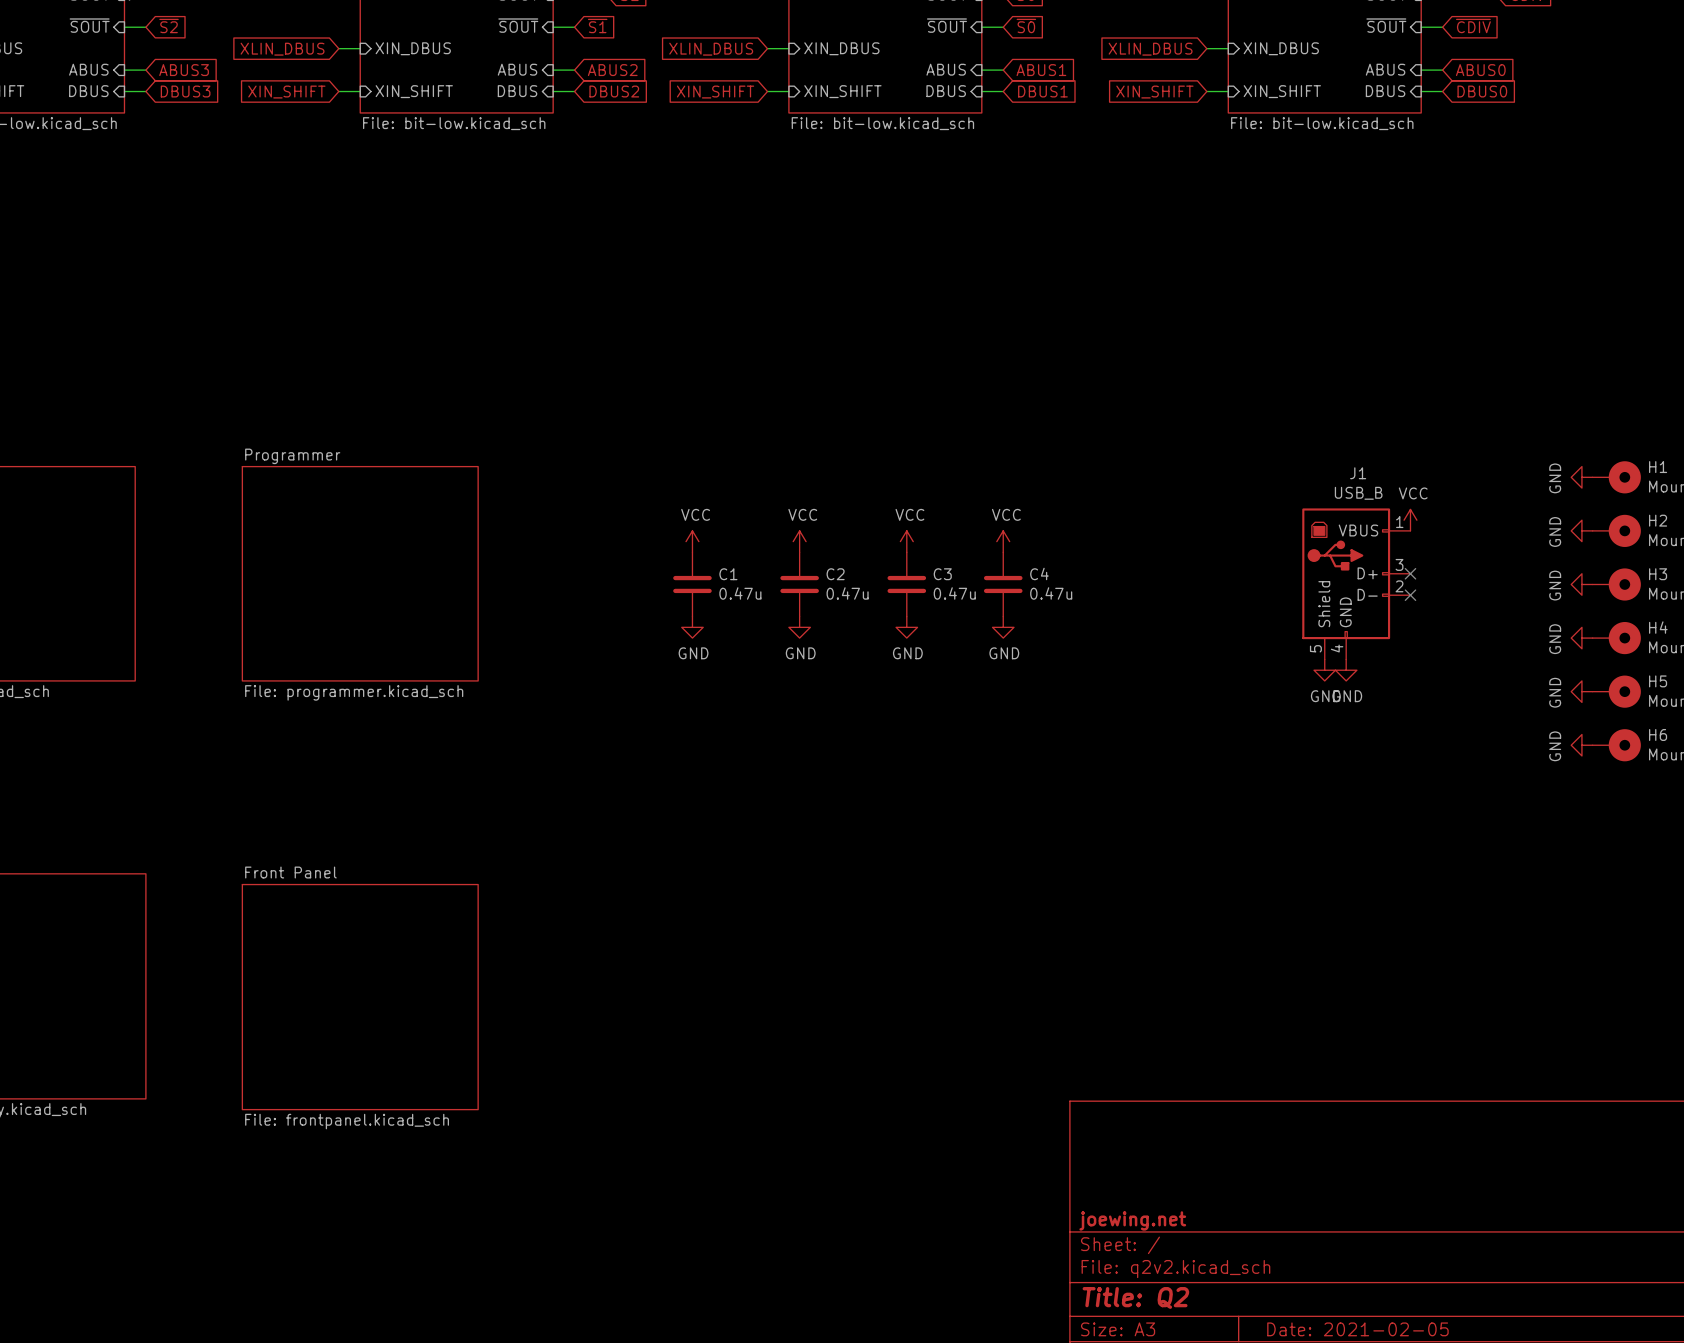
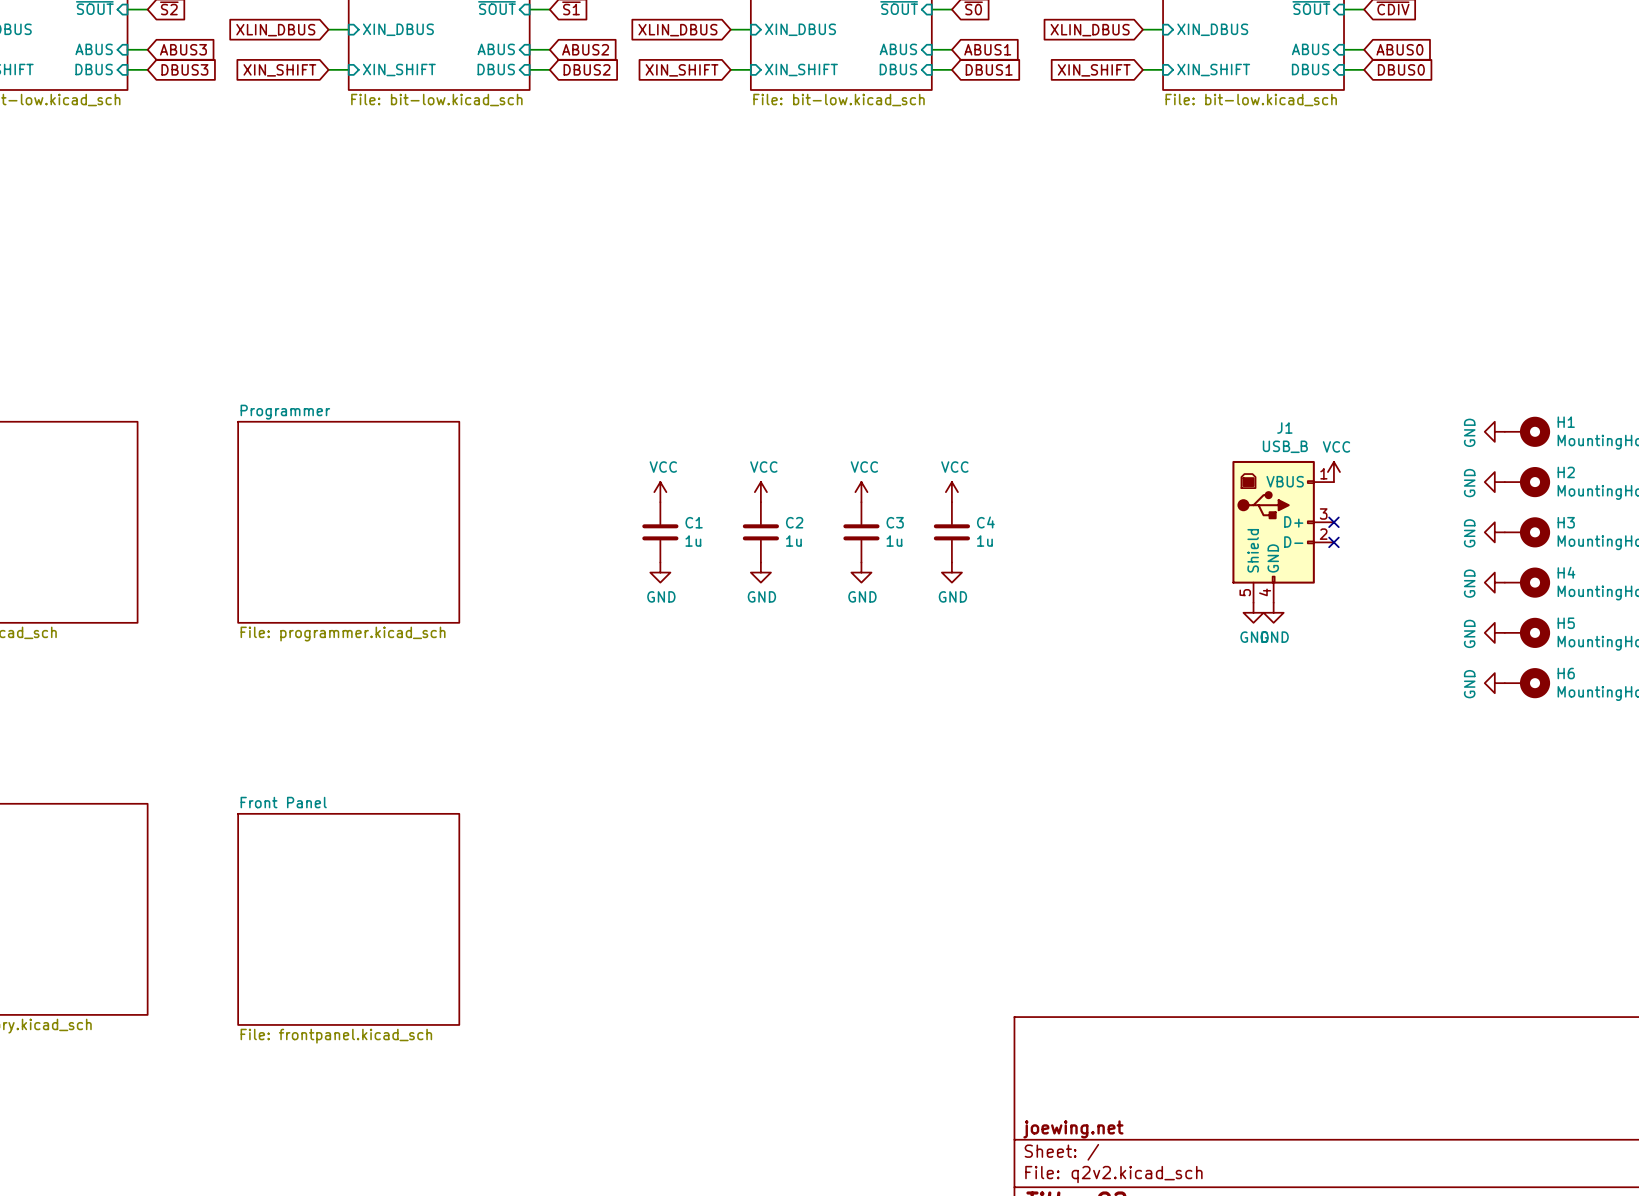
C1 value: 0.47u (740, 593) -> 1u (693, 541)
C2 value: 0.47u (847, 593) -> 1u (793, 541)
C3 value: 0.47u (954, 593) -> 1u (894, 541)
C4 value: 0.47u (1051, 593) -> 1u (984, 541)

